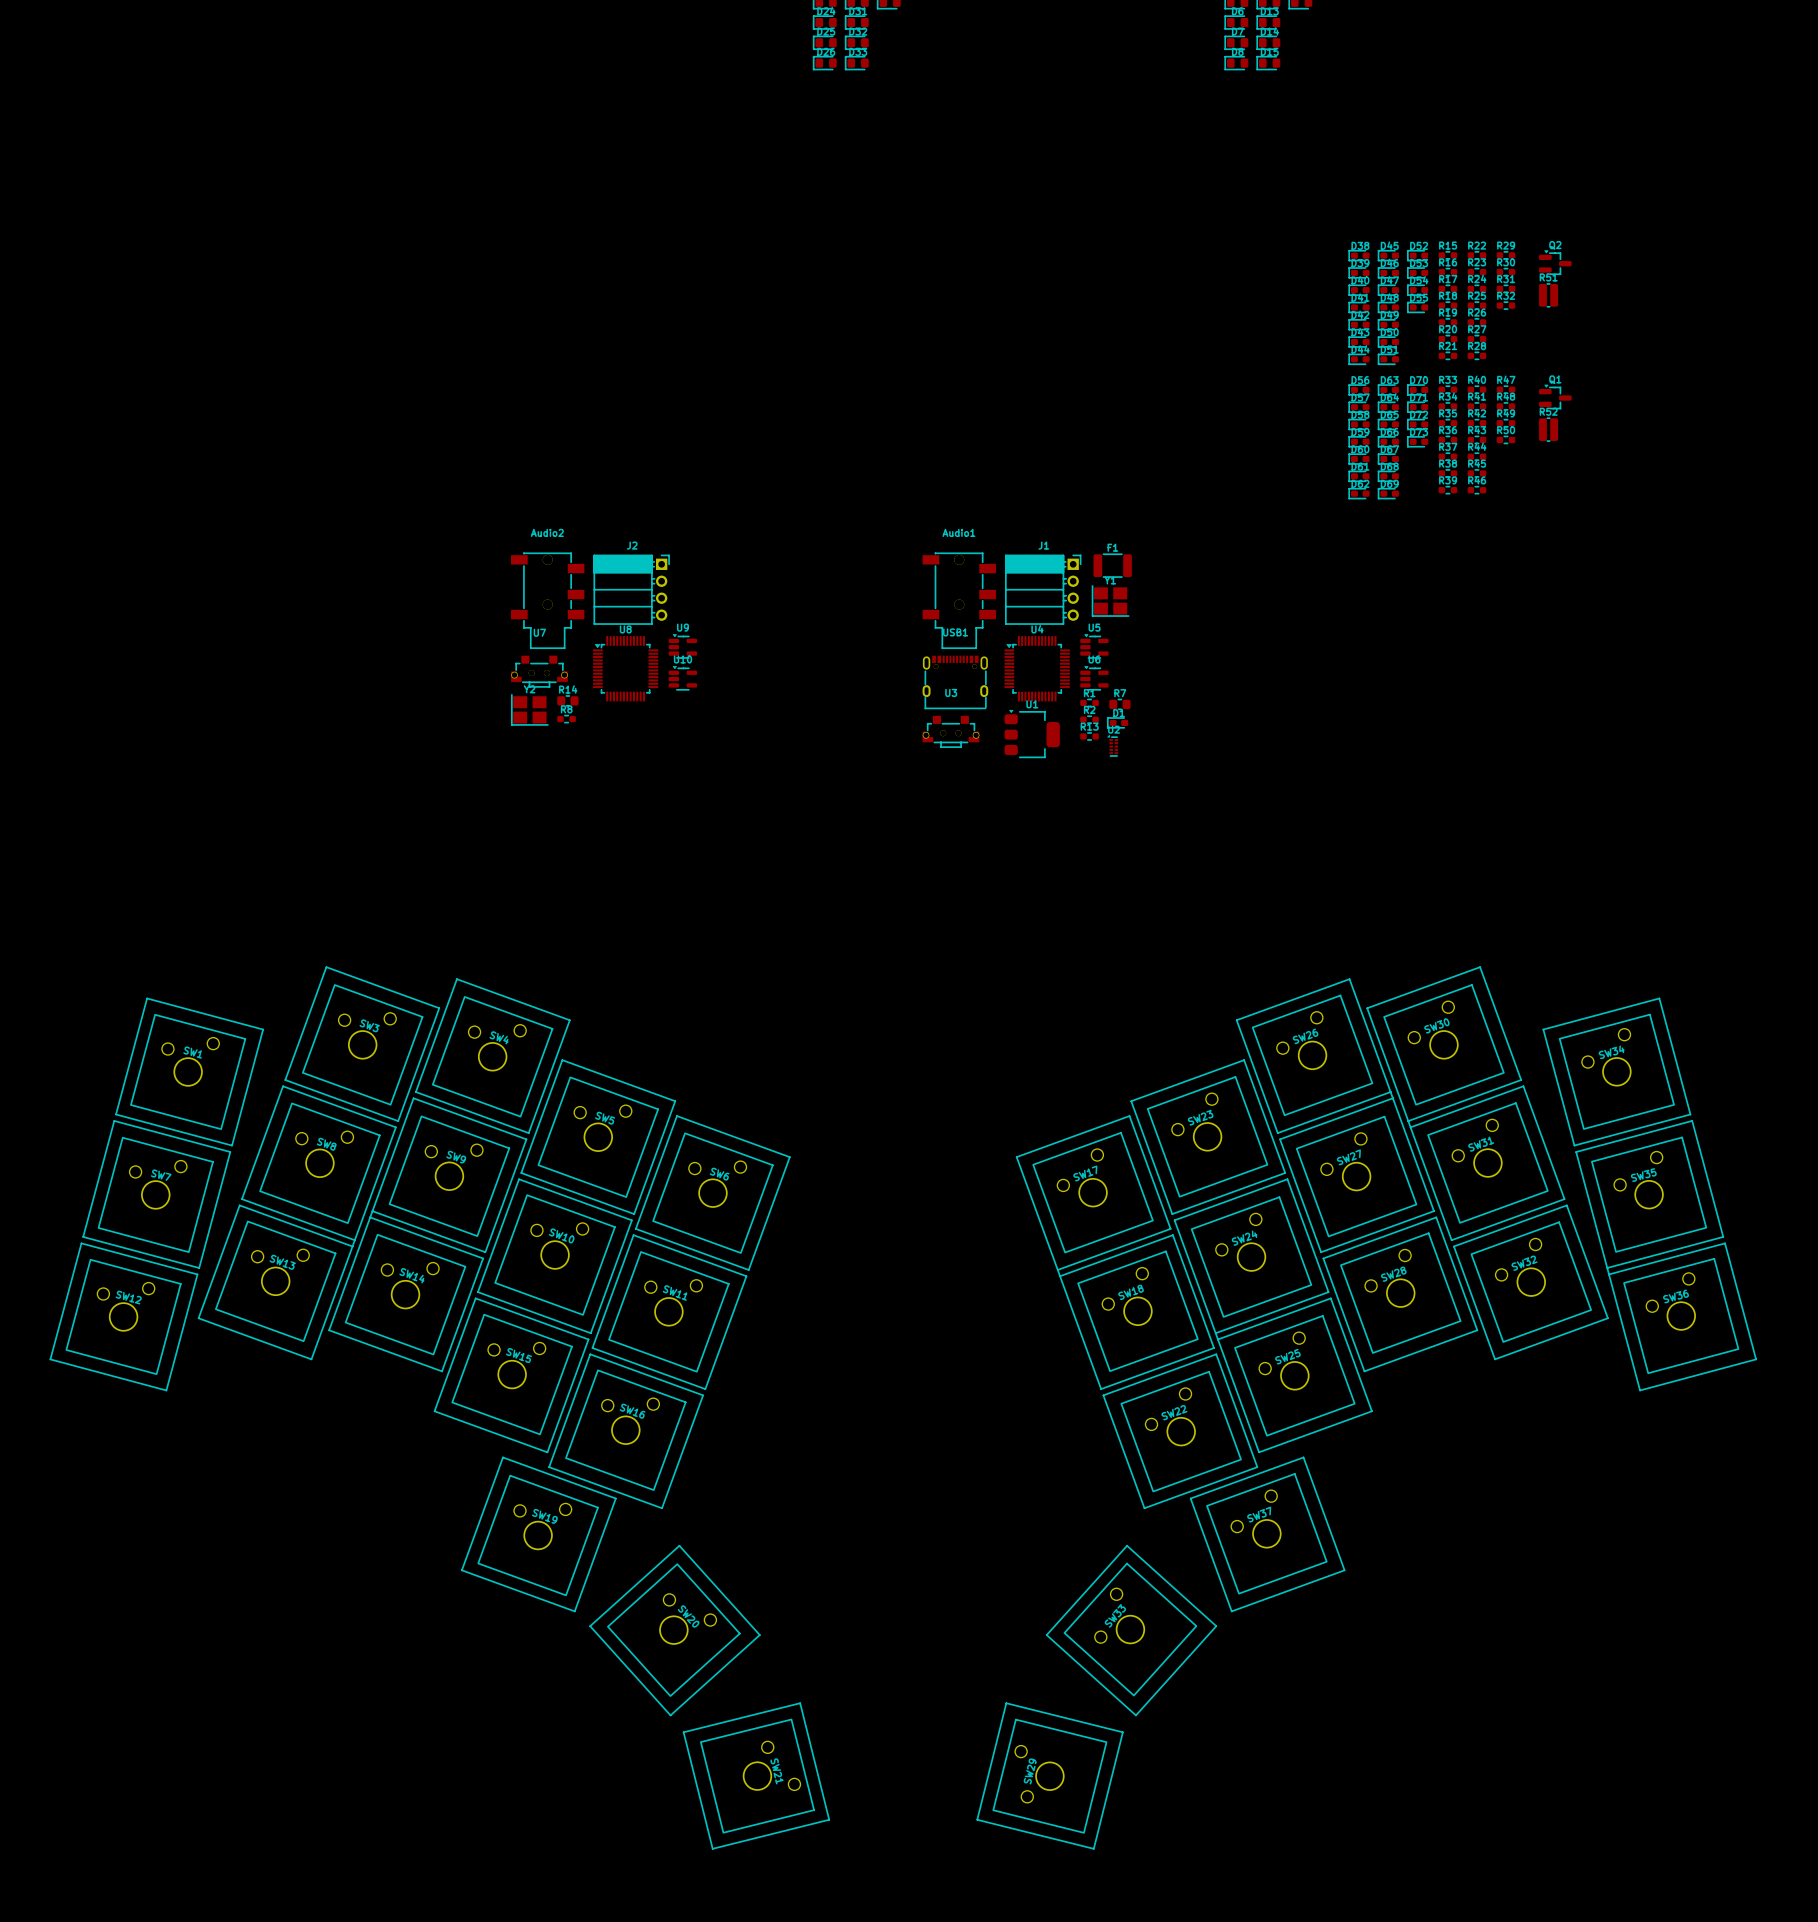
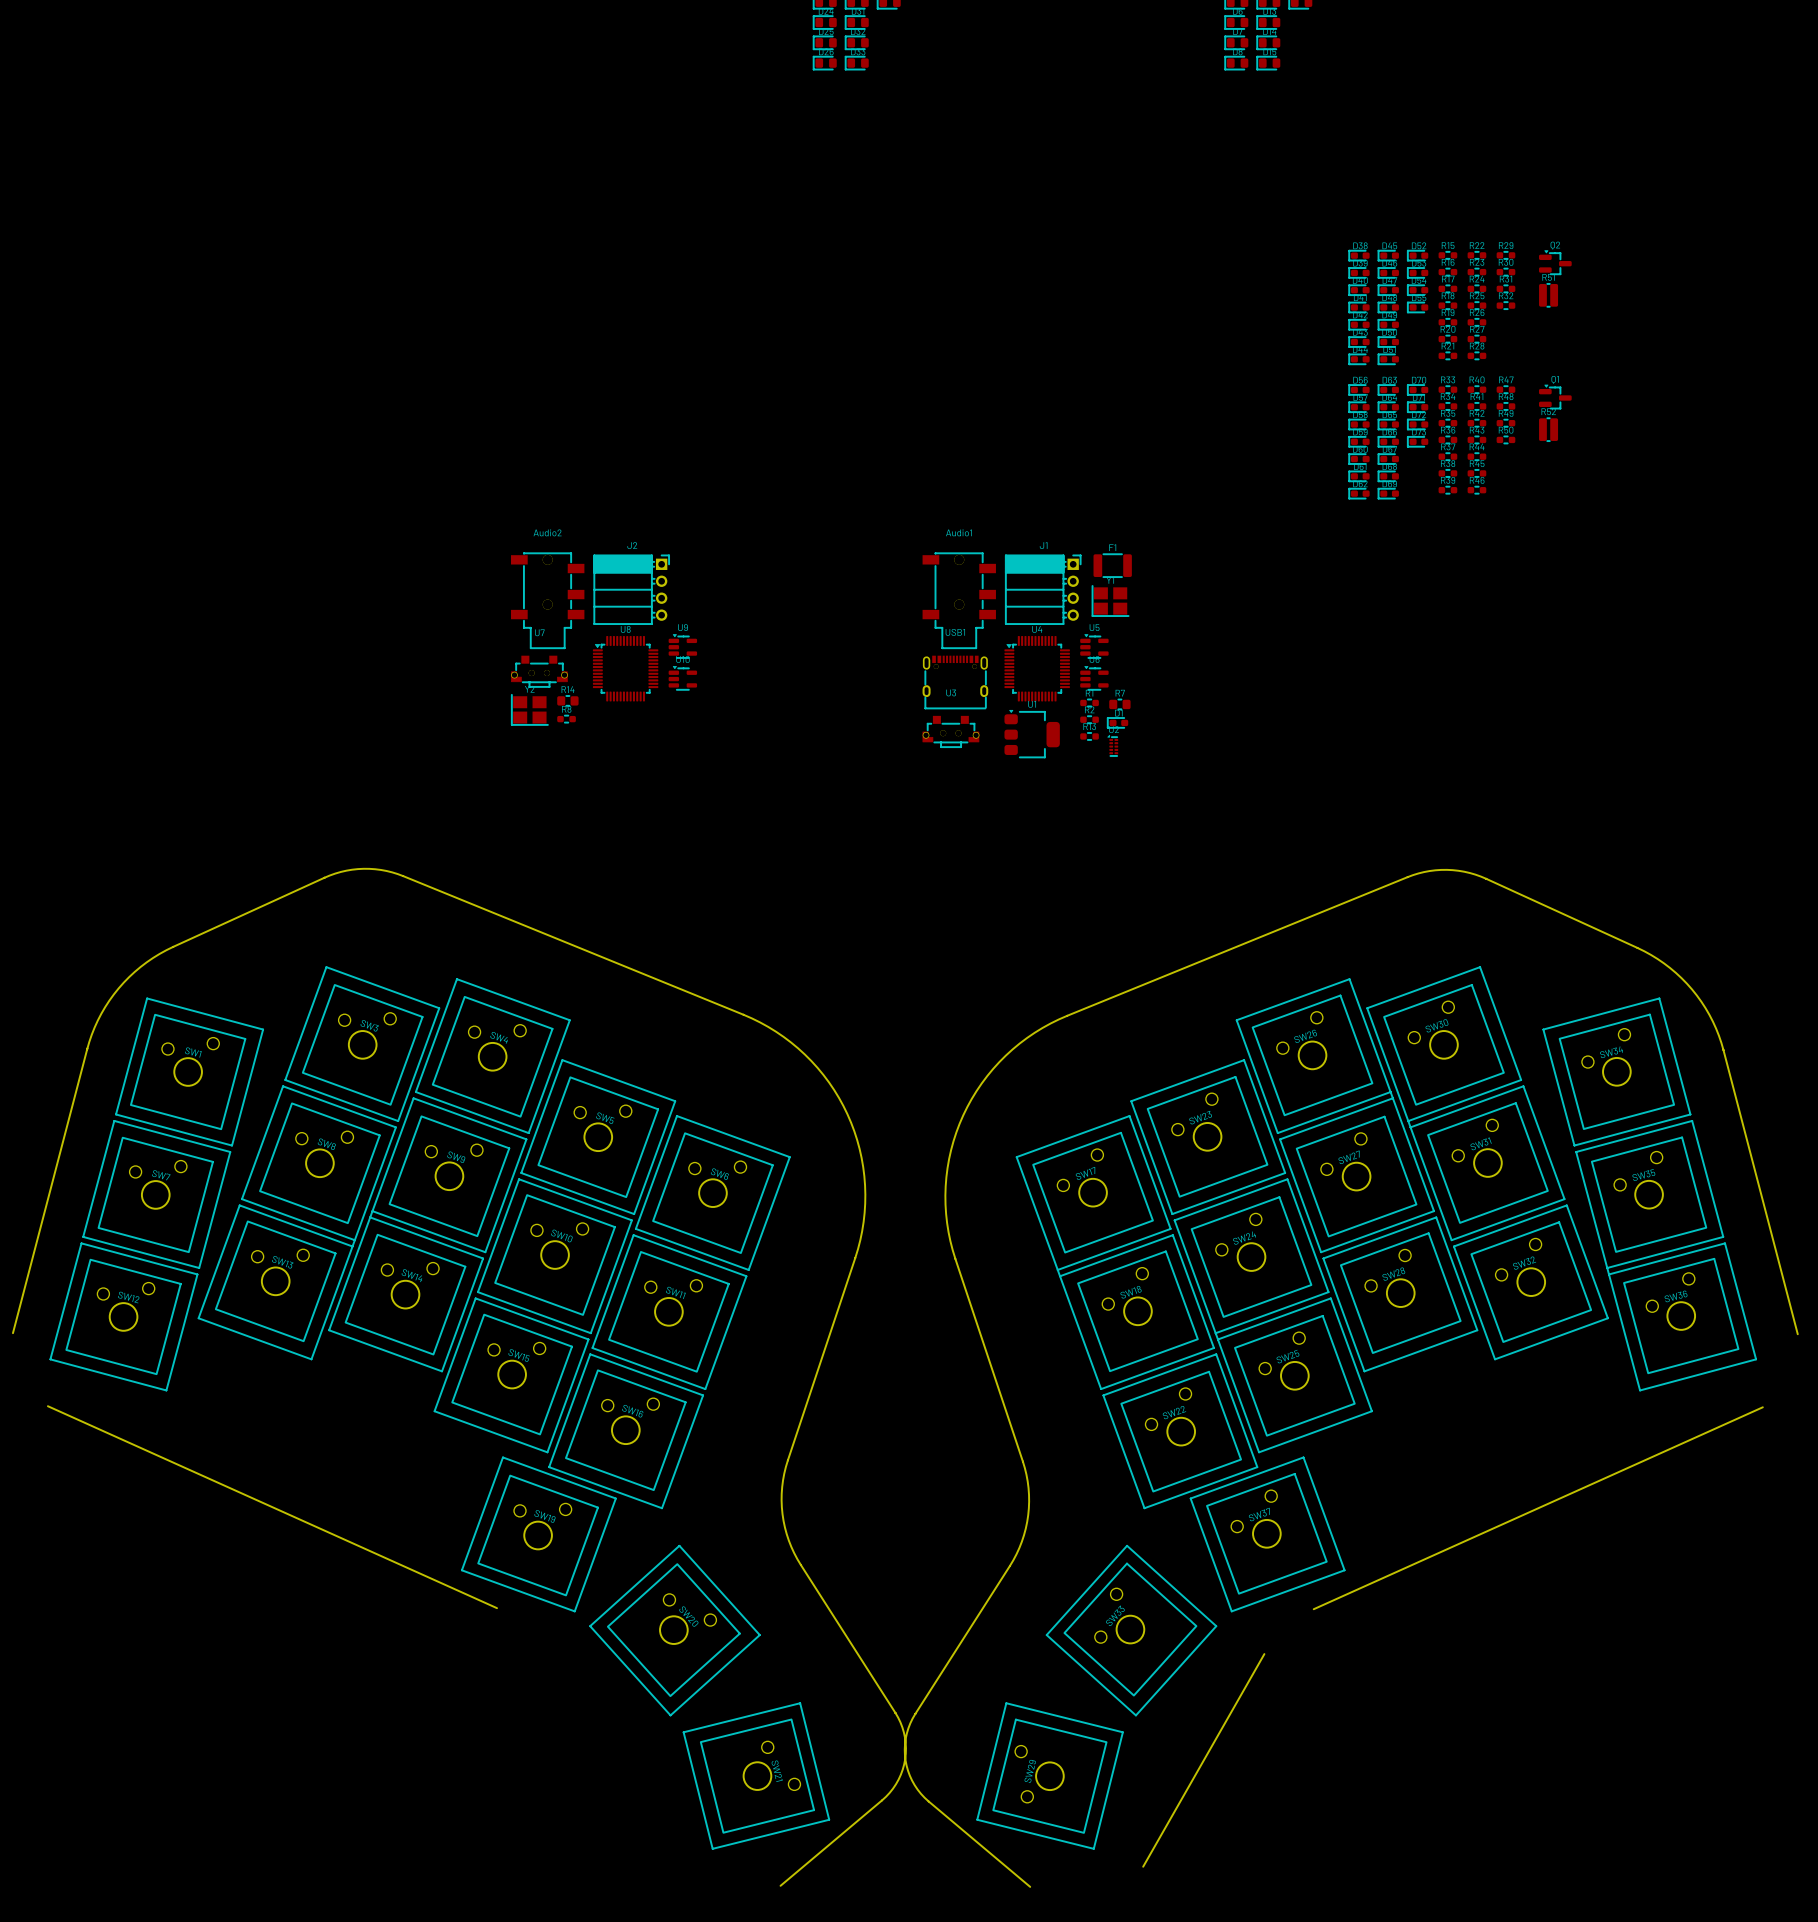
board edge: none -> (87, 1048) (12, 1333)
board edge: none -> (87, 1049) (97, 1020) (109, 1000) (129, 977) (153, 957) (173, 946) (329, 875) (346, 870) (369, 868) (386, 871) (403, 876) (751, 1018) (791, 1042) (817, 1067) (838, 1097) (854, 1131) (864, 1176) (864, 1212) (855, 1257) (785, 1466) (781, 1493) (782, 1514) (788, 1540) (797, 1559) (898, 1717) (905, 1737) (905, 1753) (900, 1774) (886, 1796) (780, 1885)
board edge: none -> (1723, 1049) (1797, 1334)
board edge: none -> (1723, 1050) (1716, 1028) (1701, 1001) (1681, 978) (1657, 958) (1637, 947) (1480, 876) (1458, 870) (1441, 869) (1424, 872) (1407, 877) (1058, 1019) (1019, 1043) (993, 1068) (971, 1098) (956, 1132) (946, 1177) (946, 1213) (955, 1258) (1024, 1468) (1028, 1488) (1028, 1515) (1024, 1535) (1013, 1560) (912, 1718) (906, 1733) (904, 1754) (909, 1775) (924, 1797) (1030, 1886)
board edge: none -> (47, 1406) (497, 1608)
board edge: none -> (1762, 1407) (1313, 1609)
board edge: none -> (1264, 1654) (1143, 1866)

